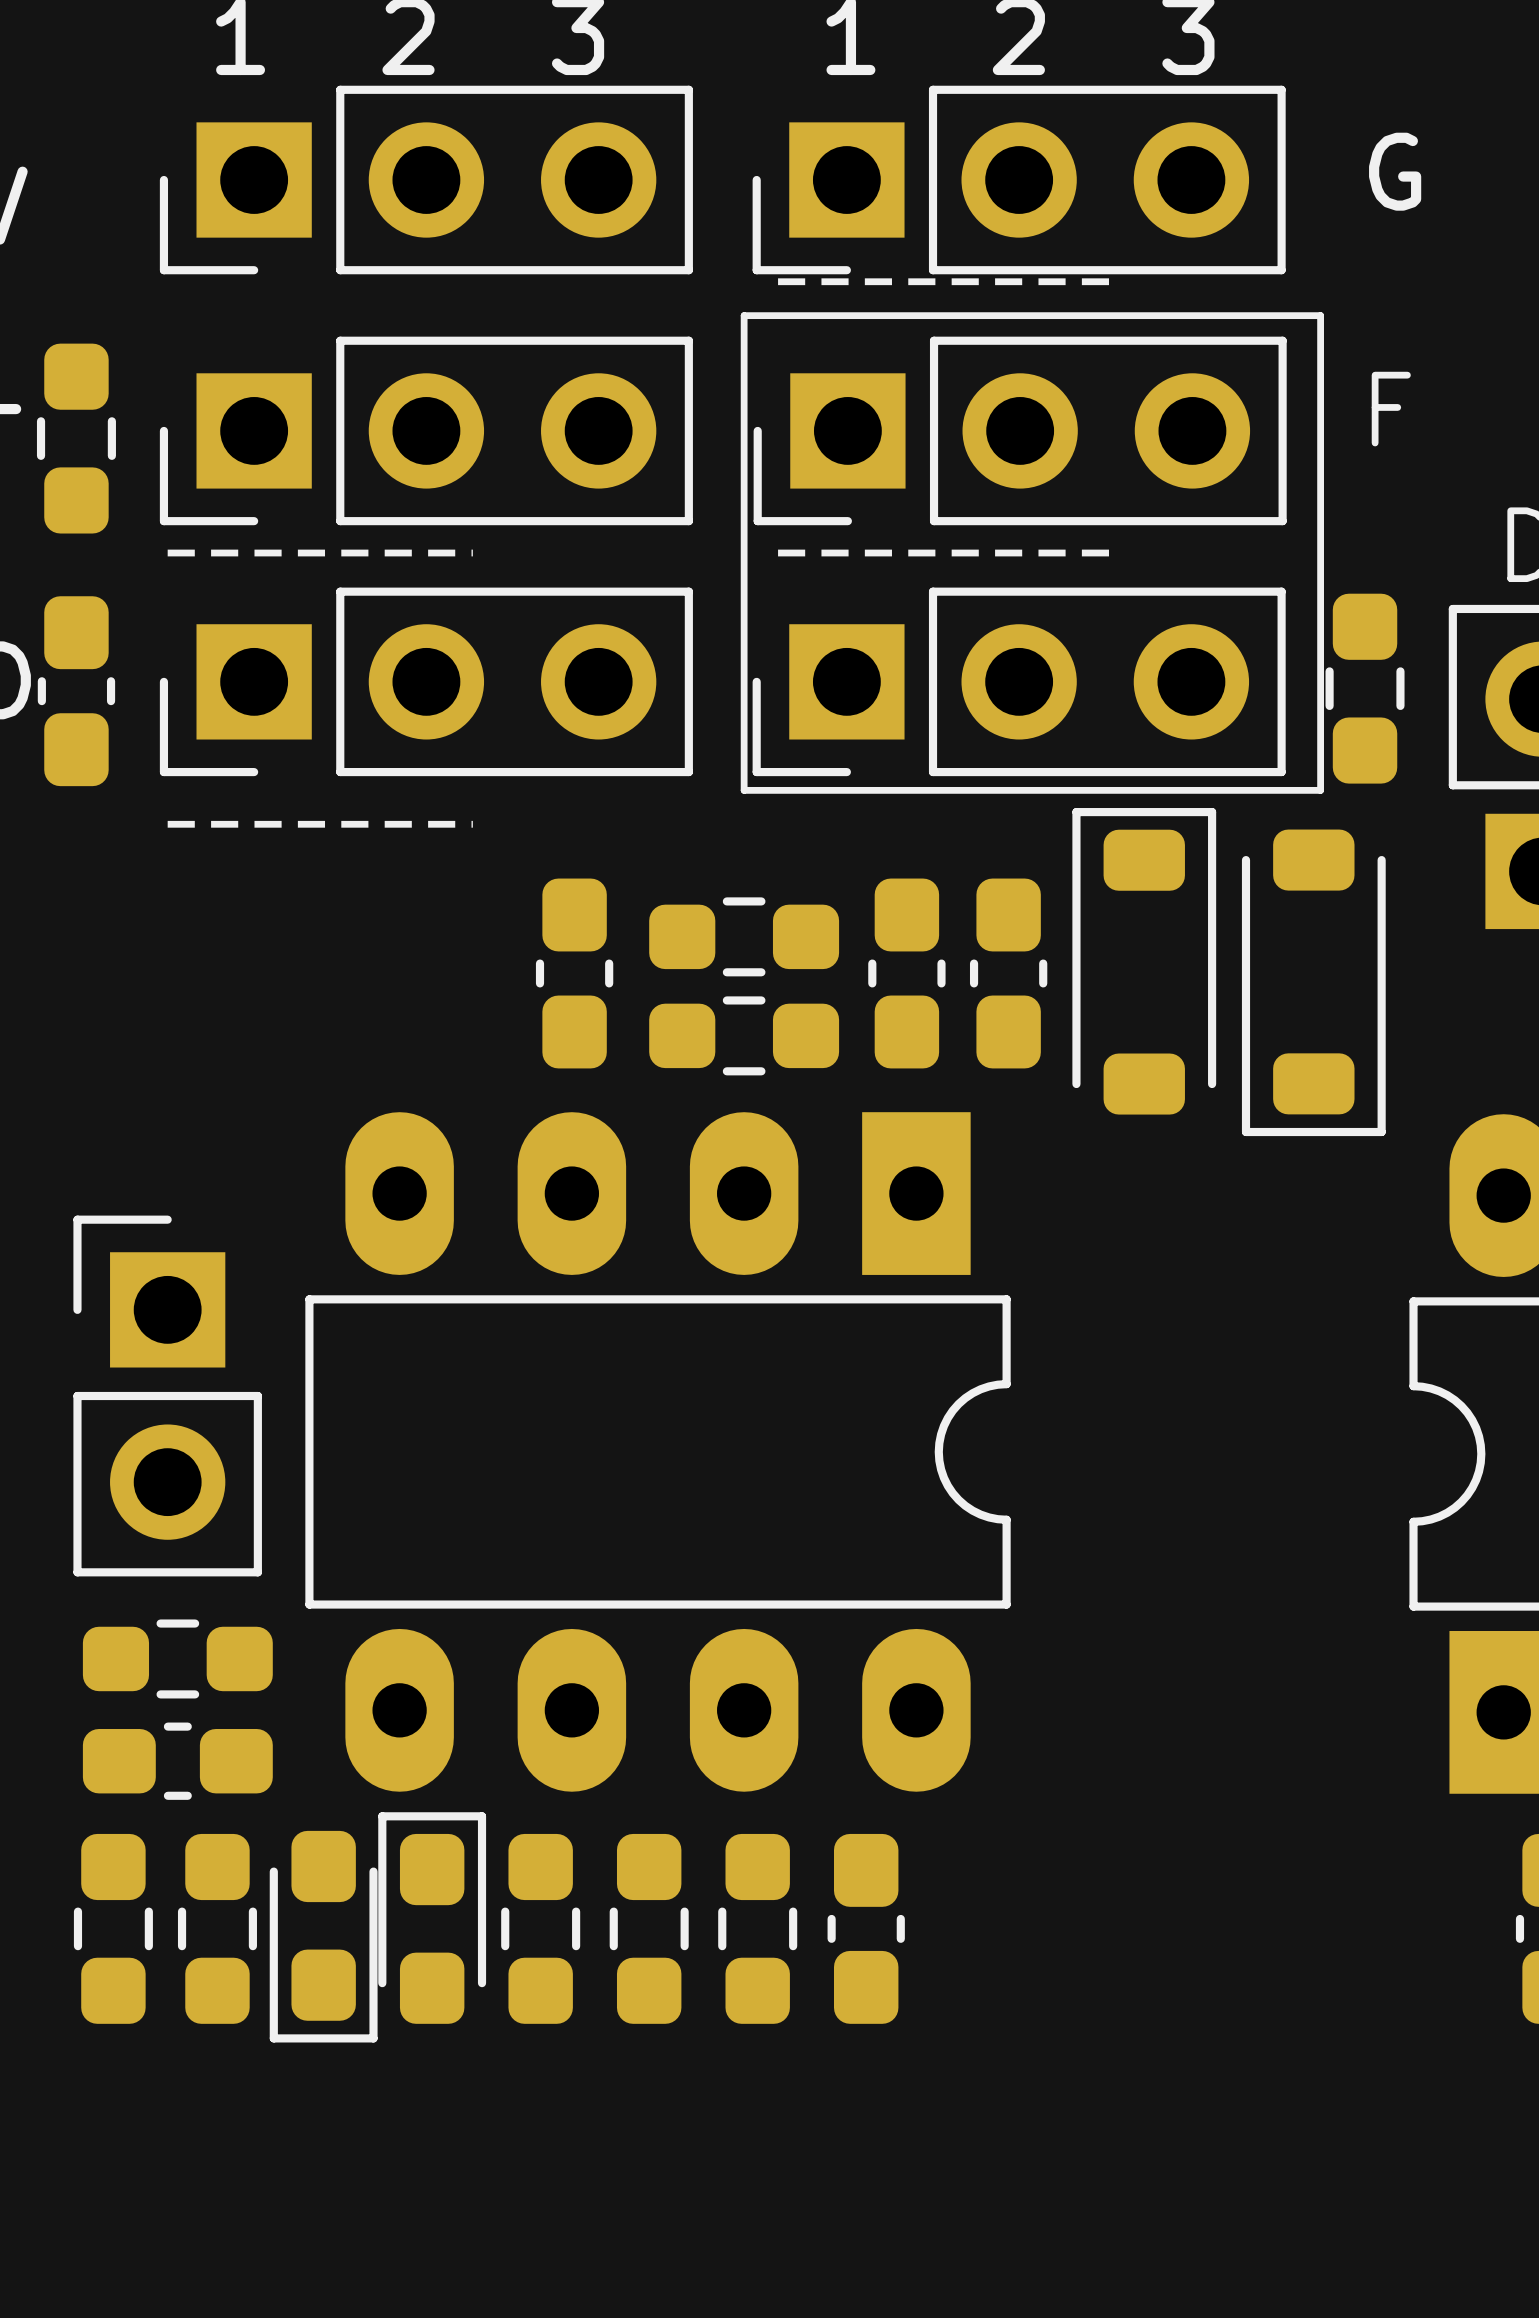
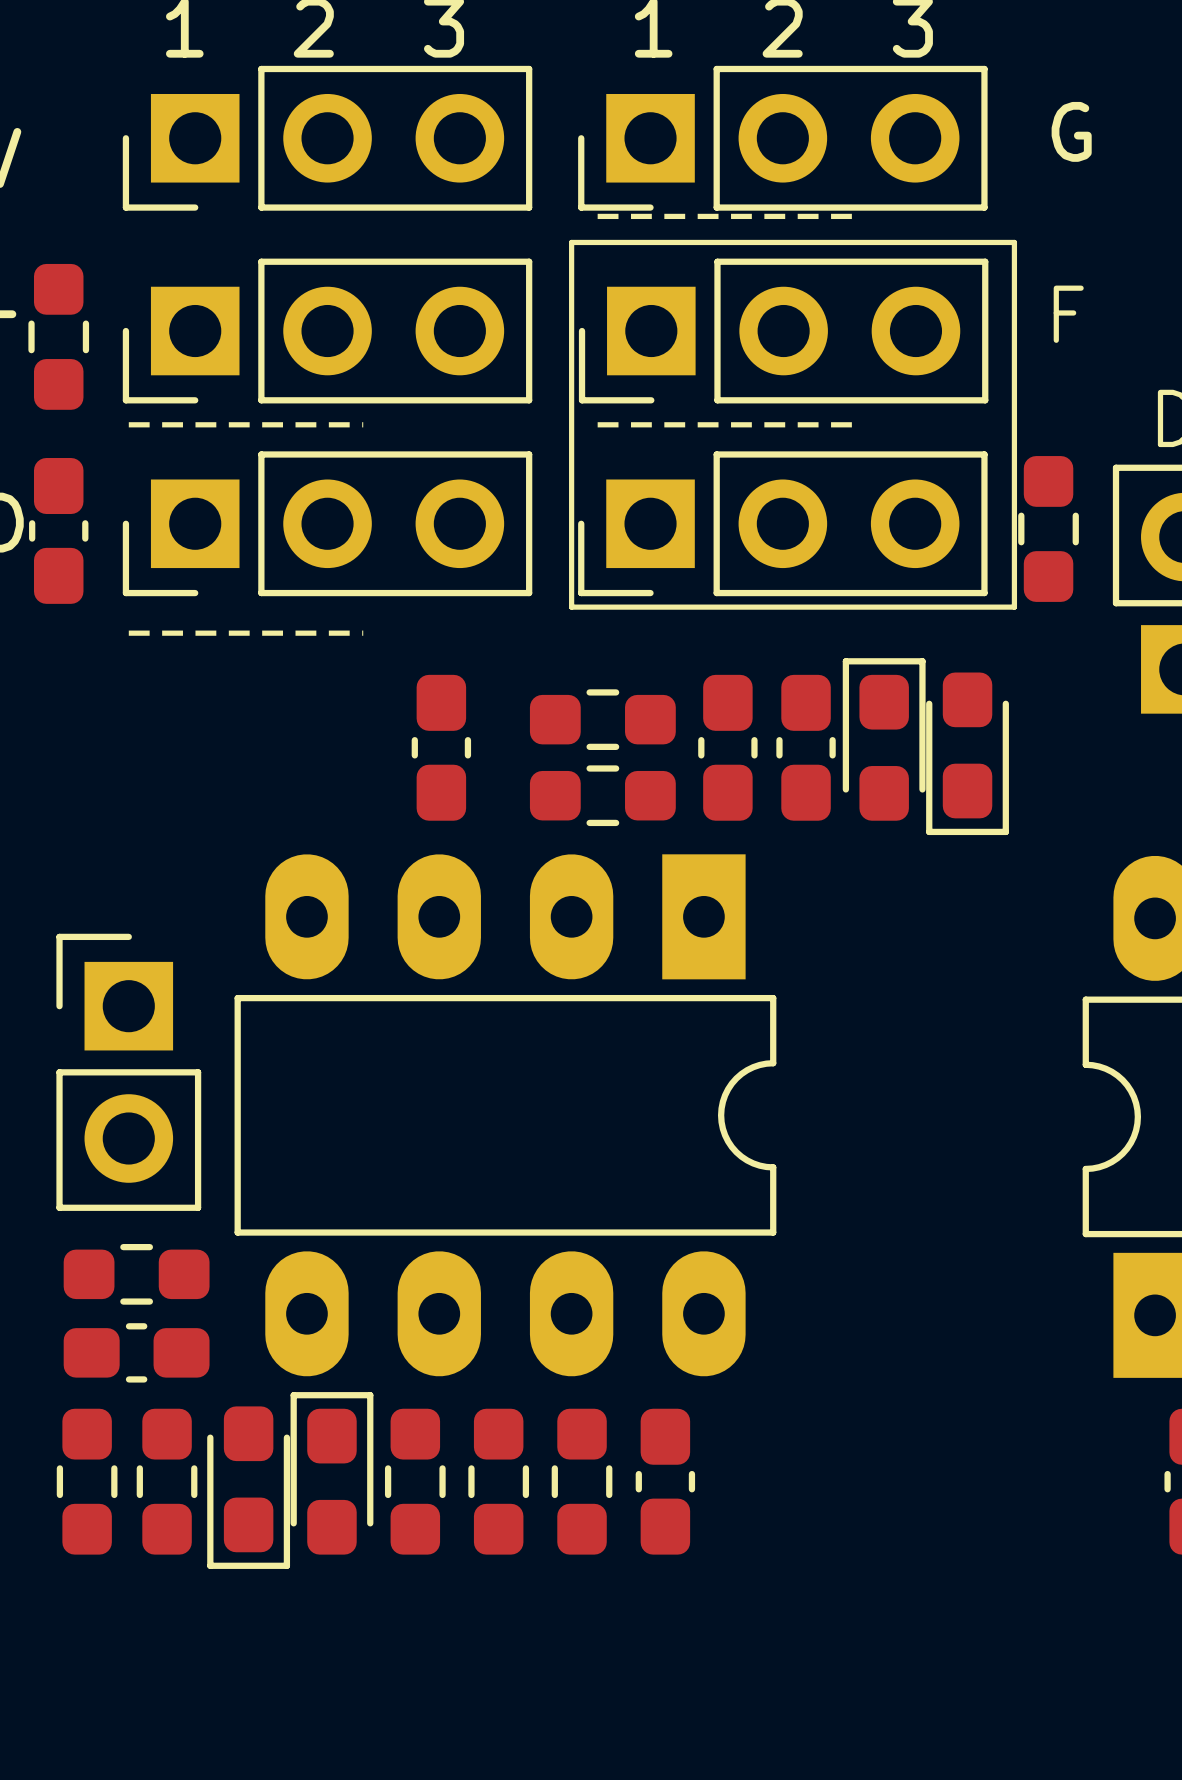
part footprint: [1072, 808, 1217, 1115] -> [842, 658, 926, 821]
part footprint: [1241, 829, 1386, 1137] -> [926, 672, 1009, 836]
part position: (744, 936) -> (602, 719)
part: (906, 973) -> none
part: none -> (727, 747)
part: (1008, 973) -> none
part: none -> (806, 747)
part position: (744, 1035) -> (602, 795)

